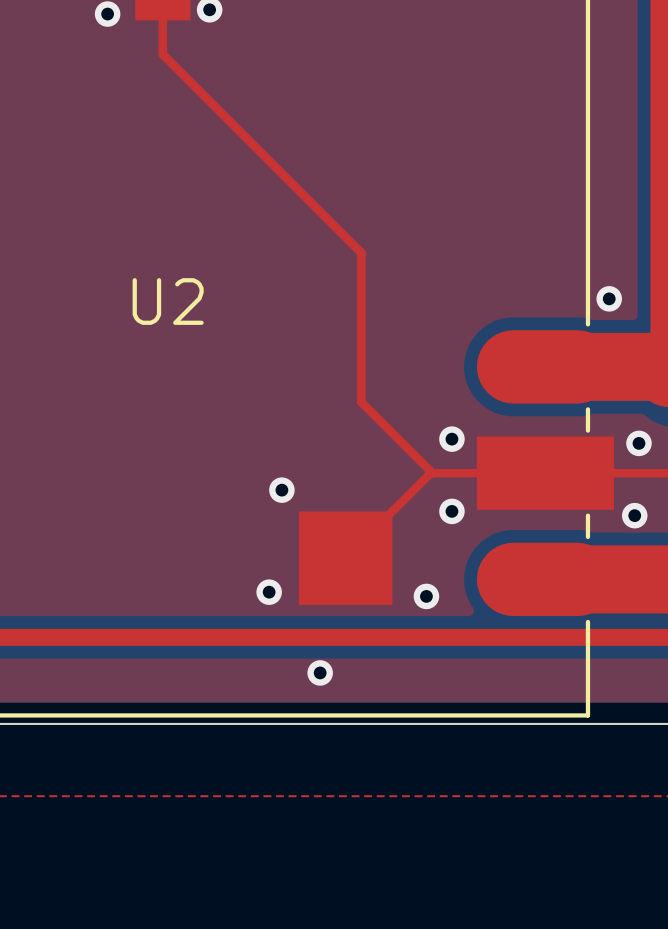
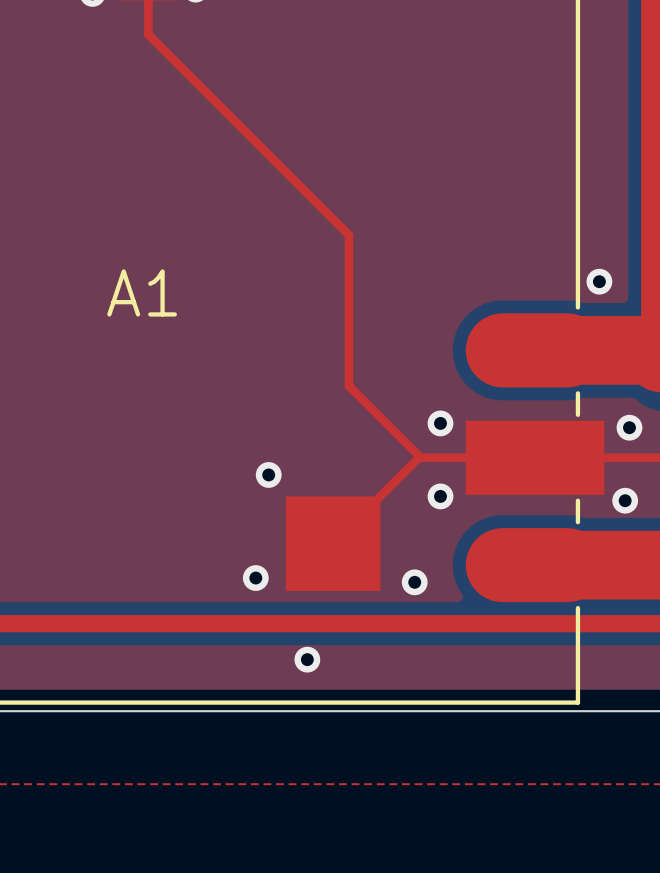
U2 name: U2 (168, 301) -> A1 (142, 292)

